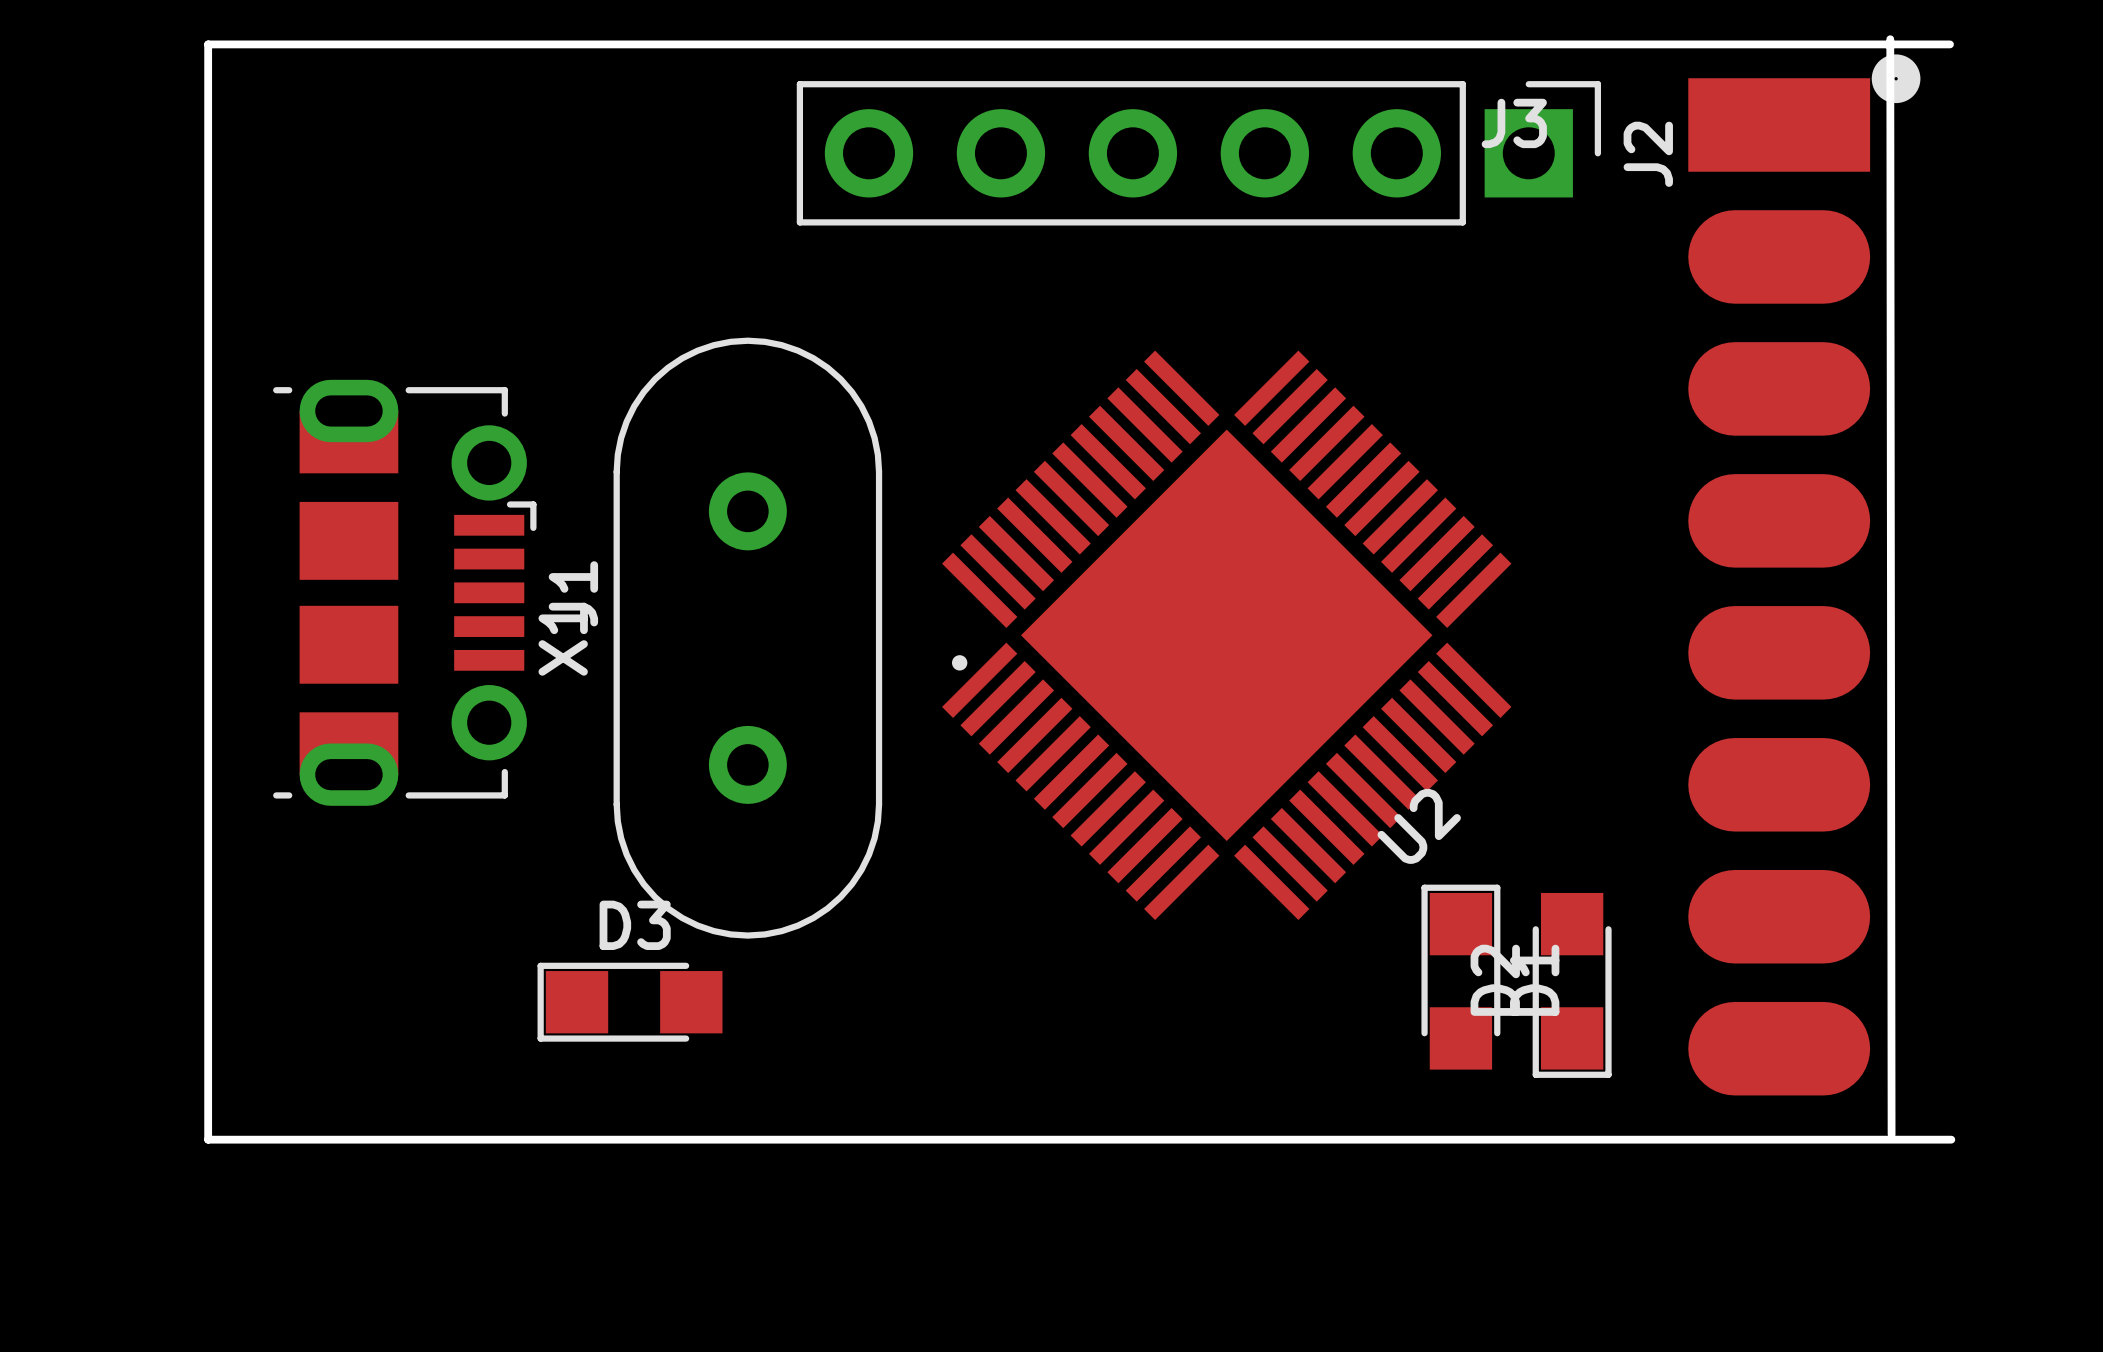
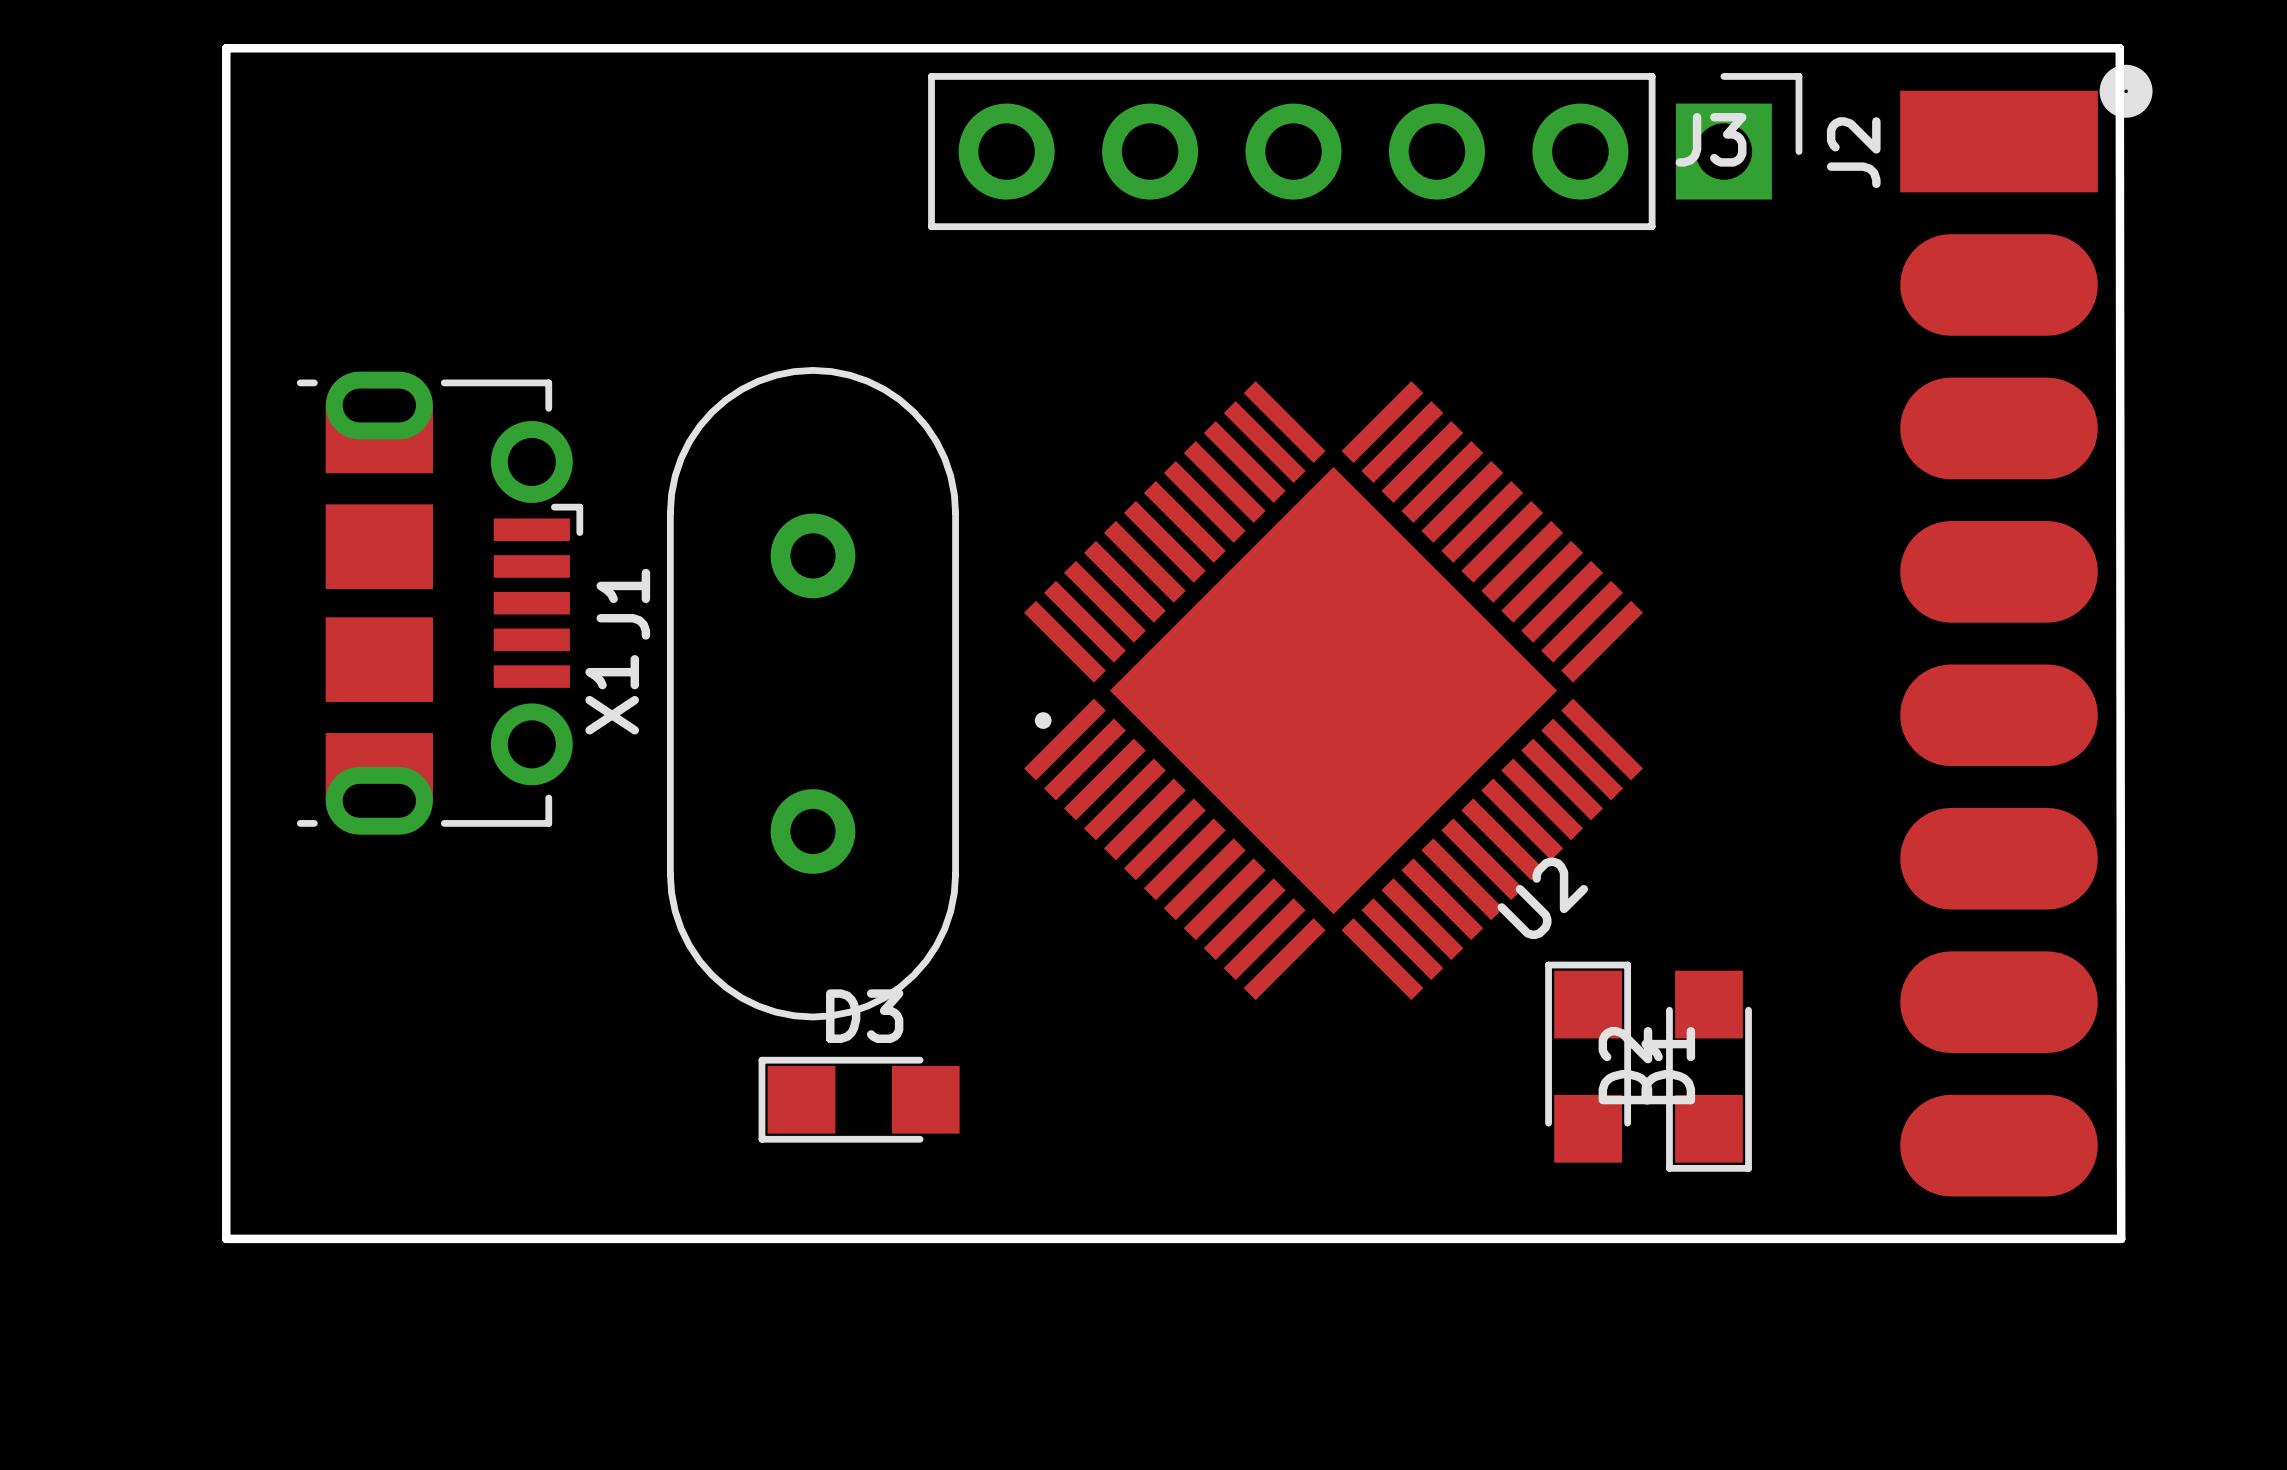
board edge: (1890, 39) (1891, 1134) -> (2119, 48) (2121, 1238)
J2 position: (1198, 153) -> (1365, 151)
J3 position: (1804, 574) -> (2026, 630)
J1 position: (404, 592) -> (440, 603)
D3 position: (630, 1002) -> (859, 1099)

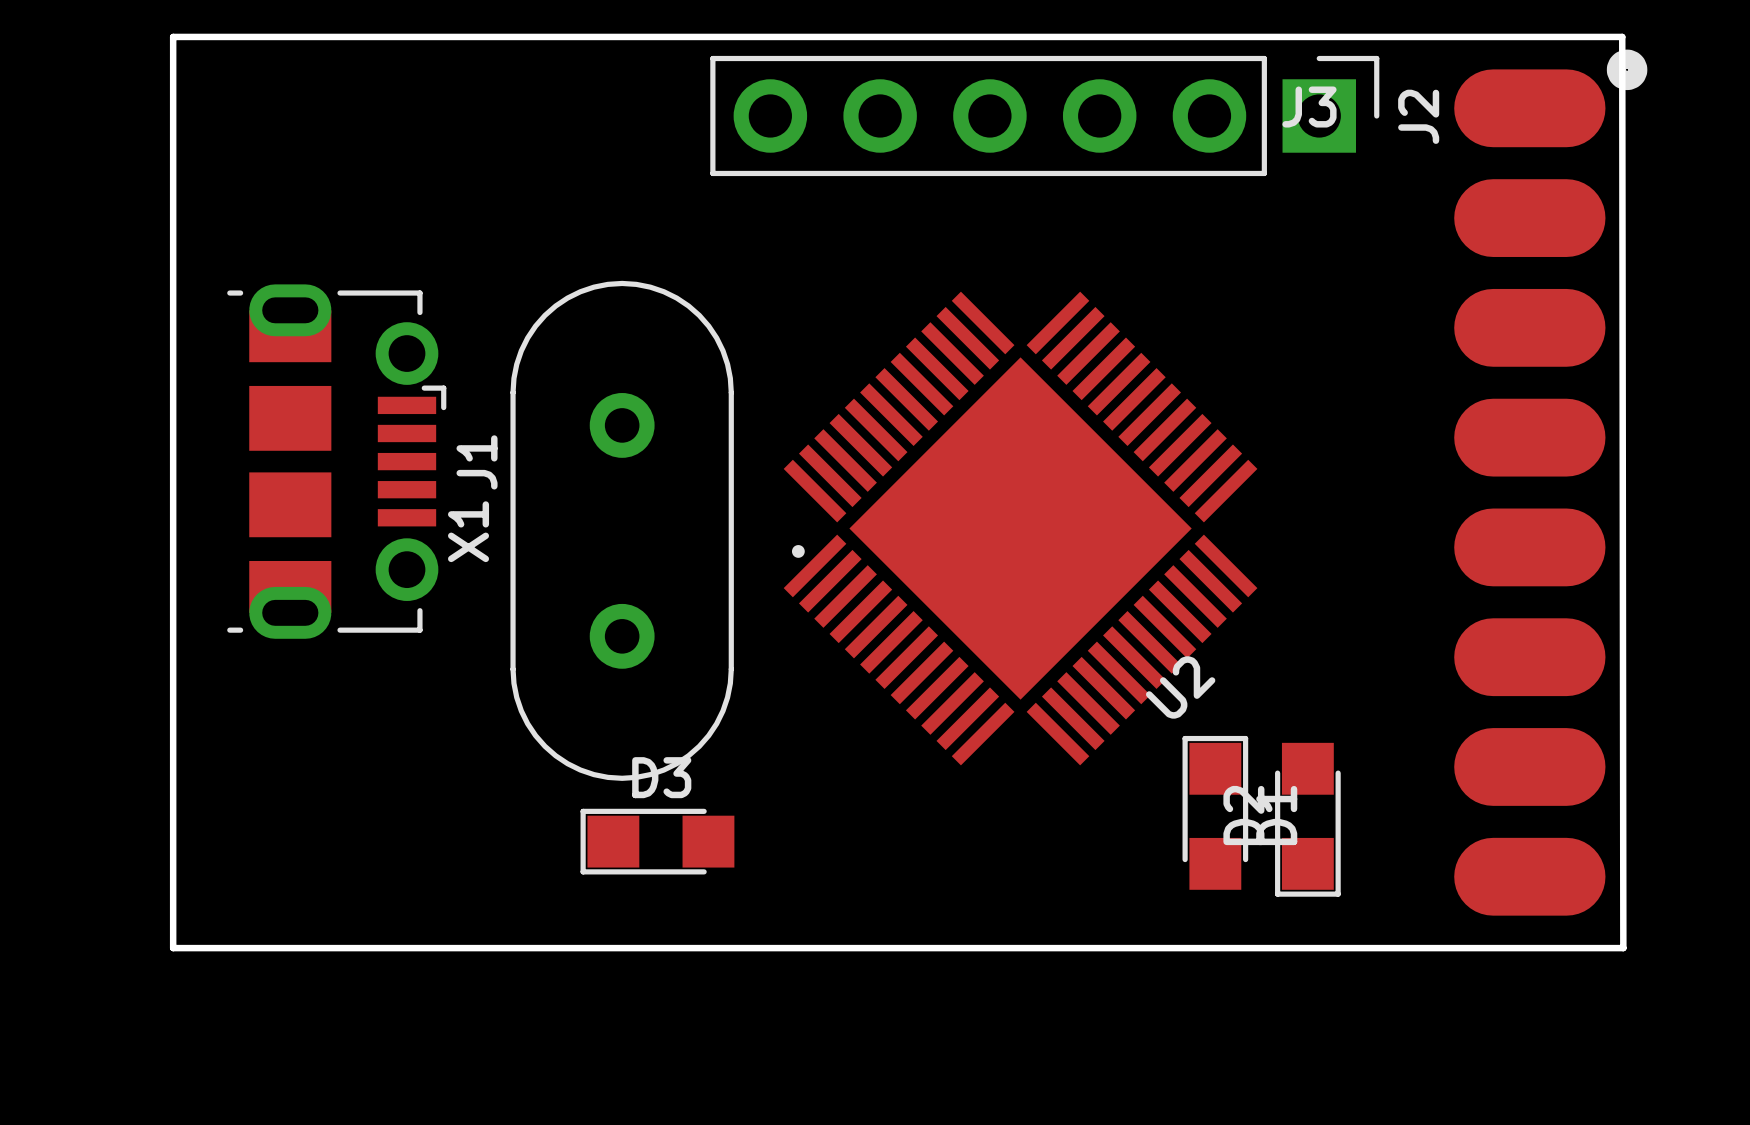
J3 footprint: [1900, 64, 2153, 1197] -> [1454, 49, 1648, 916]

